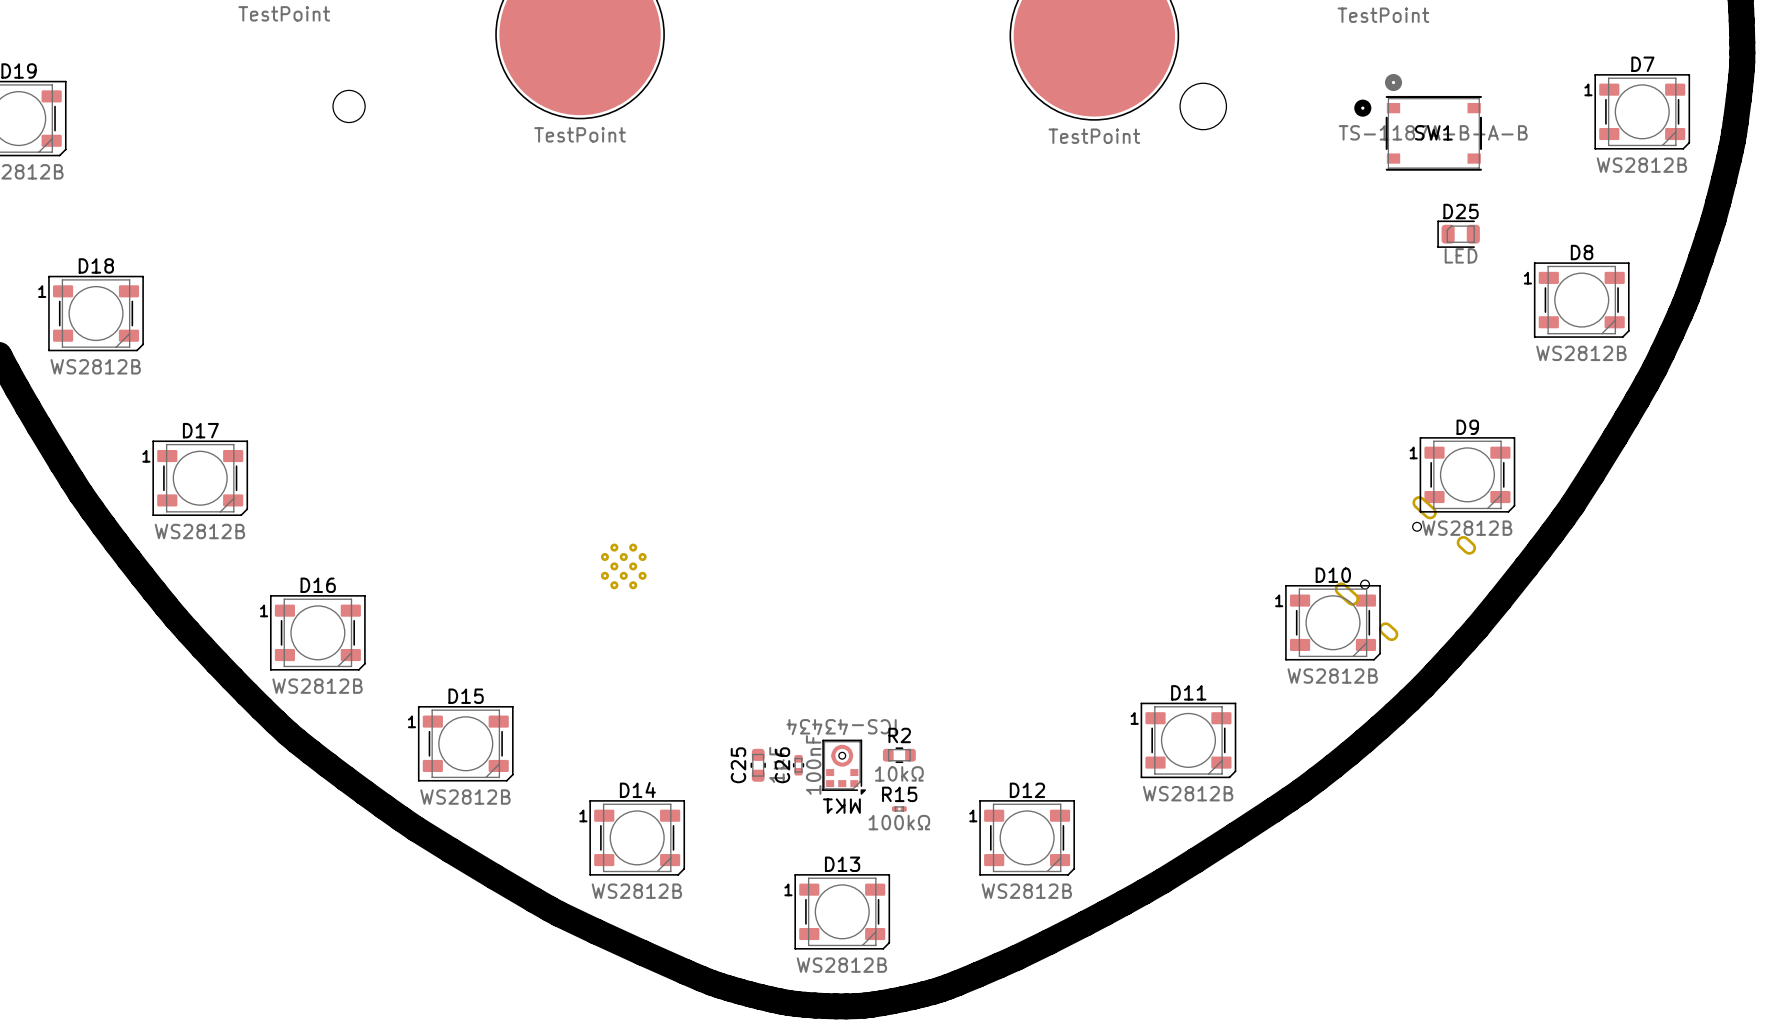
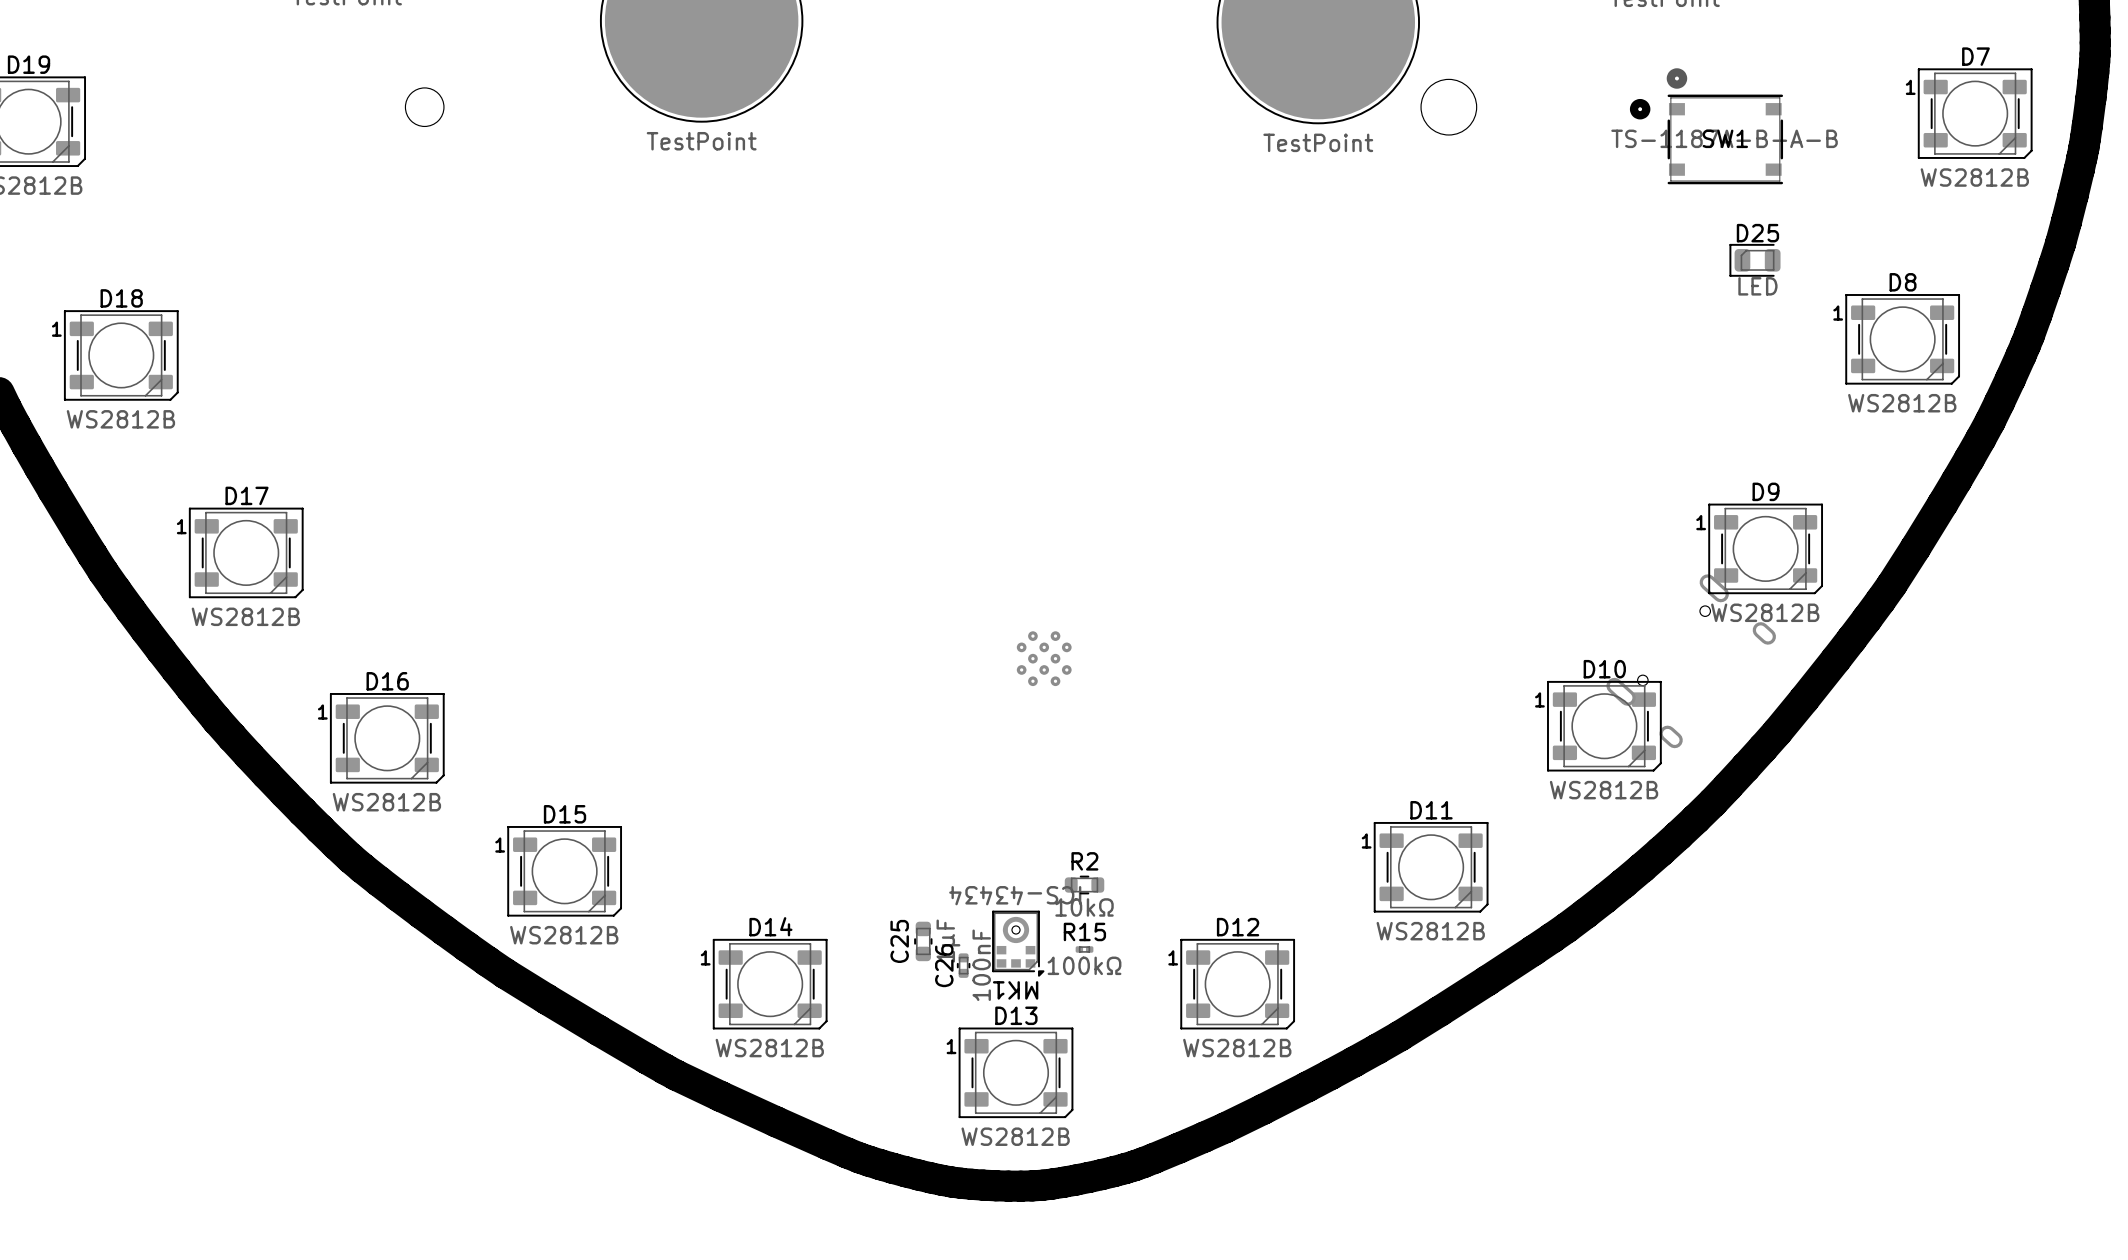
part position: (623, 566) -> (1044, 658)
C25 position: (758, 765) -> (923, 941)
C26 position: (798, 765) -> (963, 965)
MK1 position: (844, 767) -> (1018, 943)

